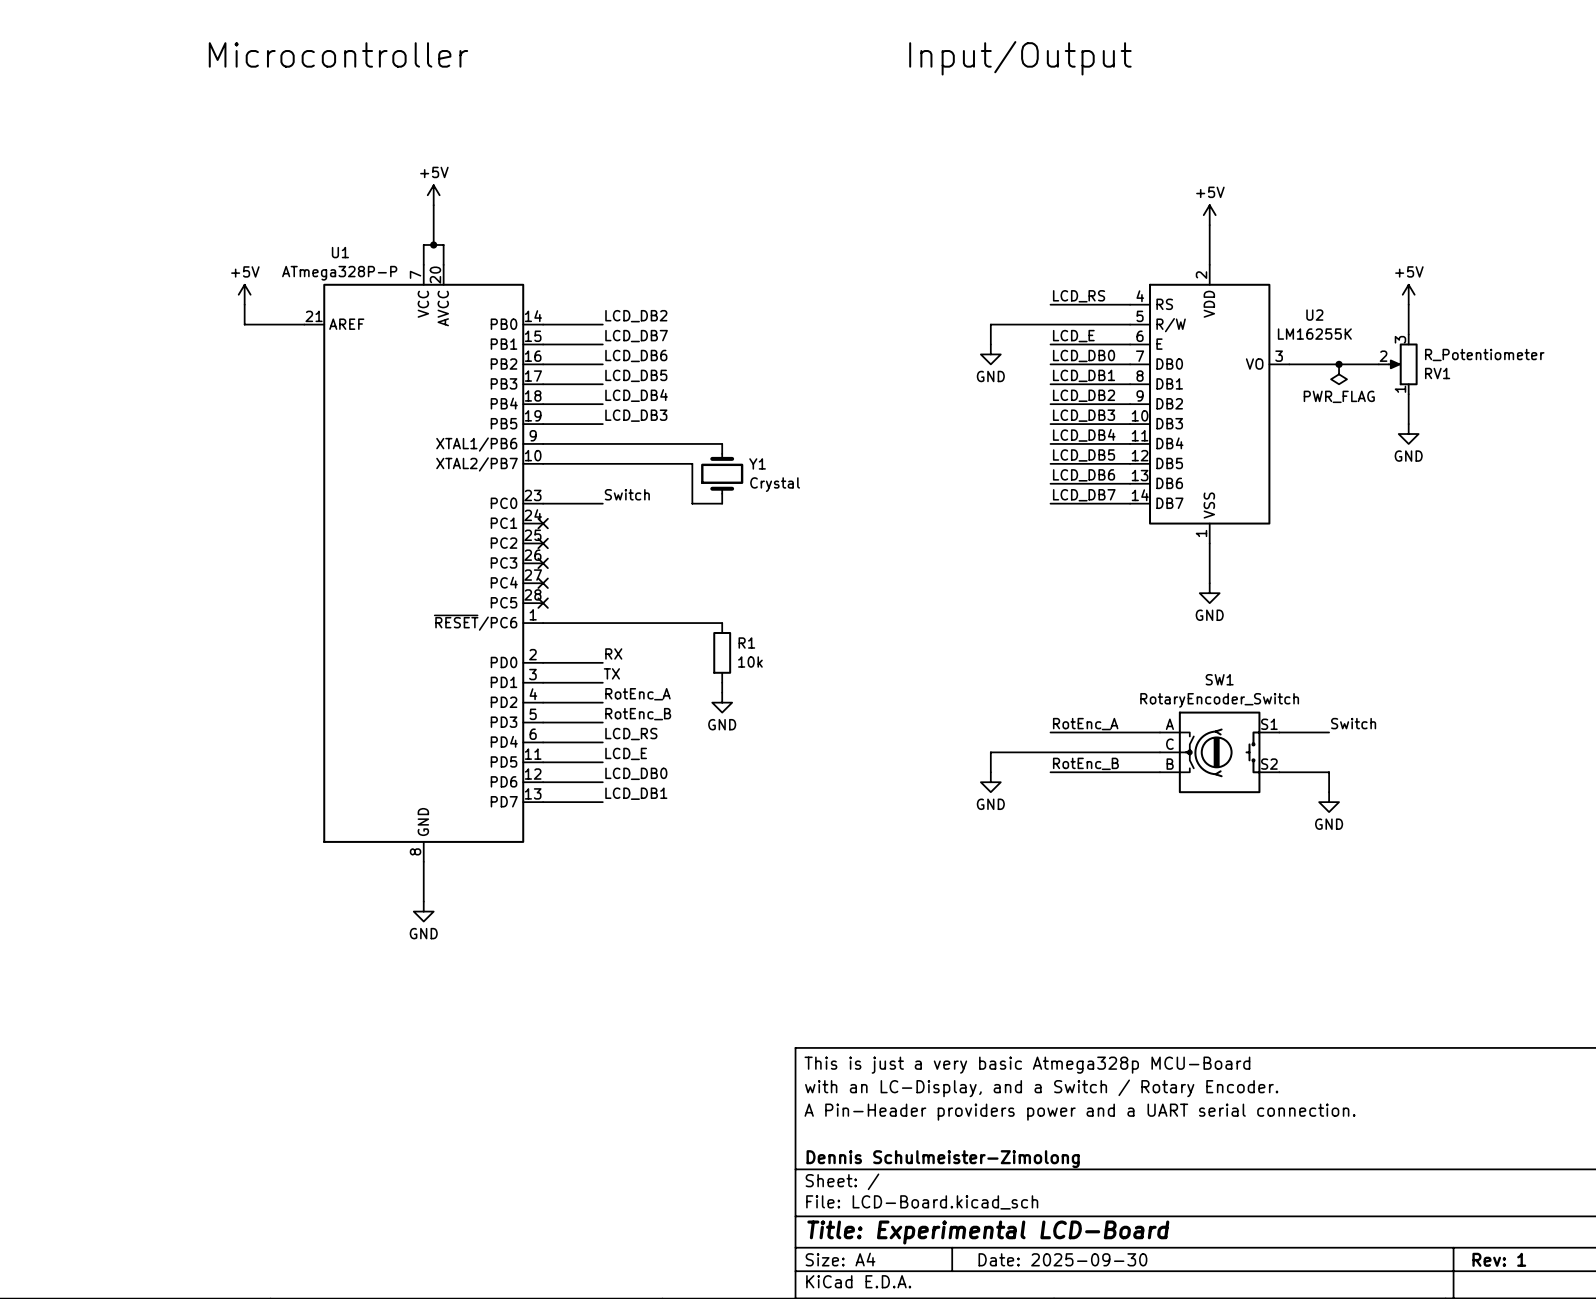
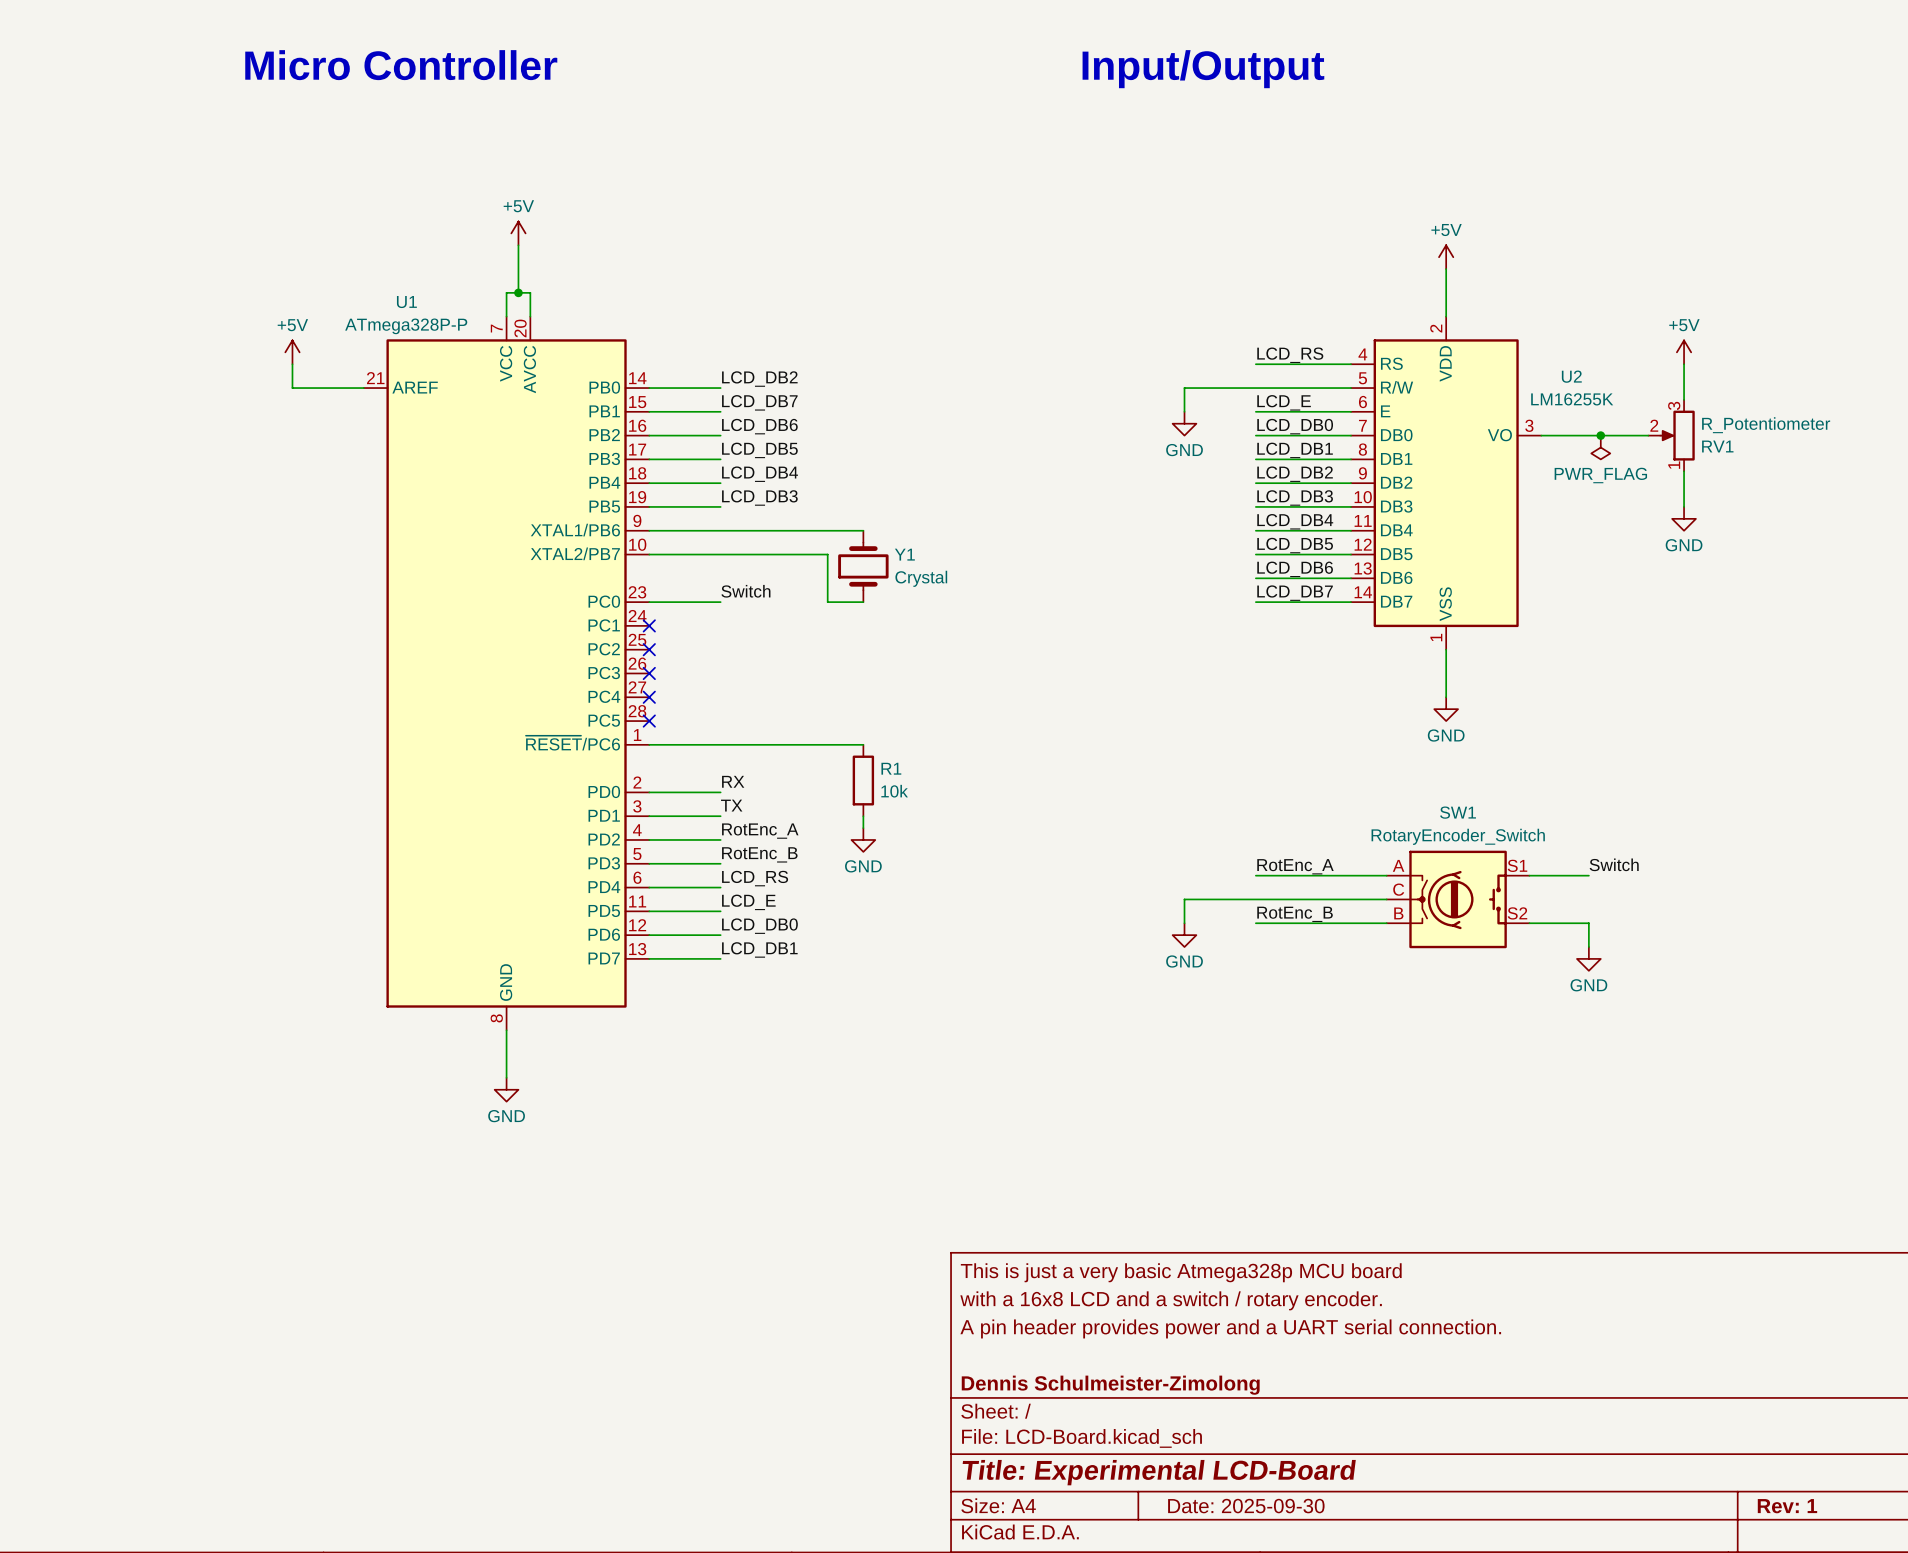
text: Microcontroller (338, 54) -> Micro Controller (401, 65)
title block: This is just a very basic Atmega328p MCU-Board (1027, 1065) -> This is just a very basic Atmega328p MCU board (1181, 1272)
title block: with an LC-Display, and a Switch / Rotary Encoder. (1041, 1088) -> with a 16x8 LCD and a switch / rotary encoder. (1171, 1300)
title block: A Pin-Header providers power and a UART serial connection. (1080, 1112) -> A pin header provides power and a UART serial connection. (1230, 1328)

